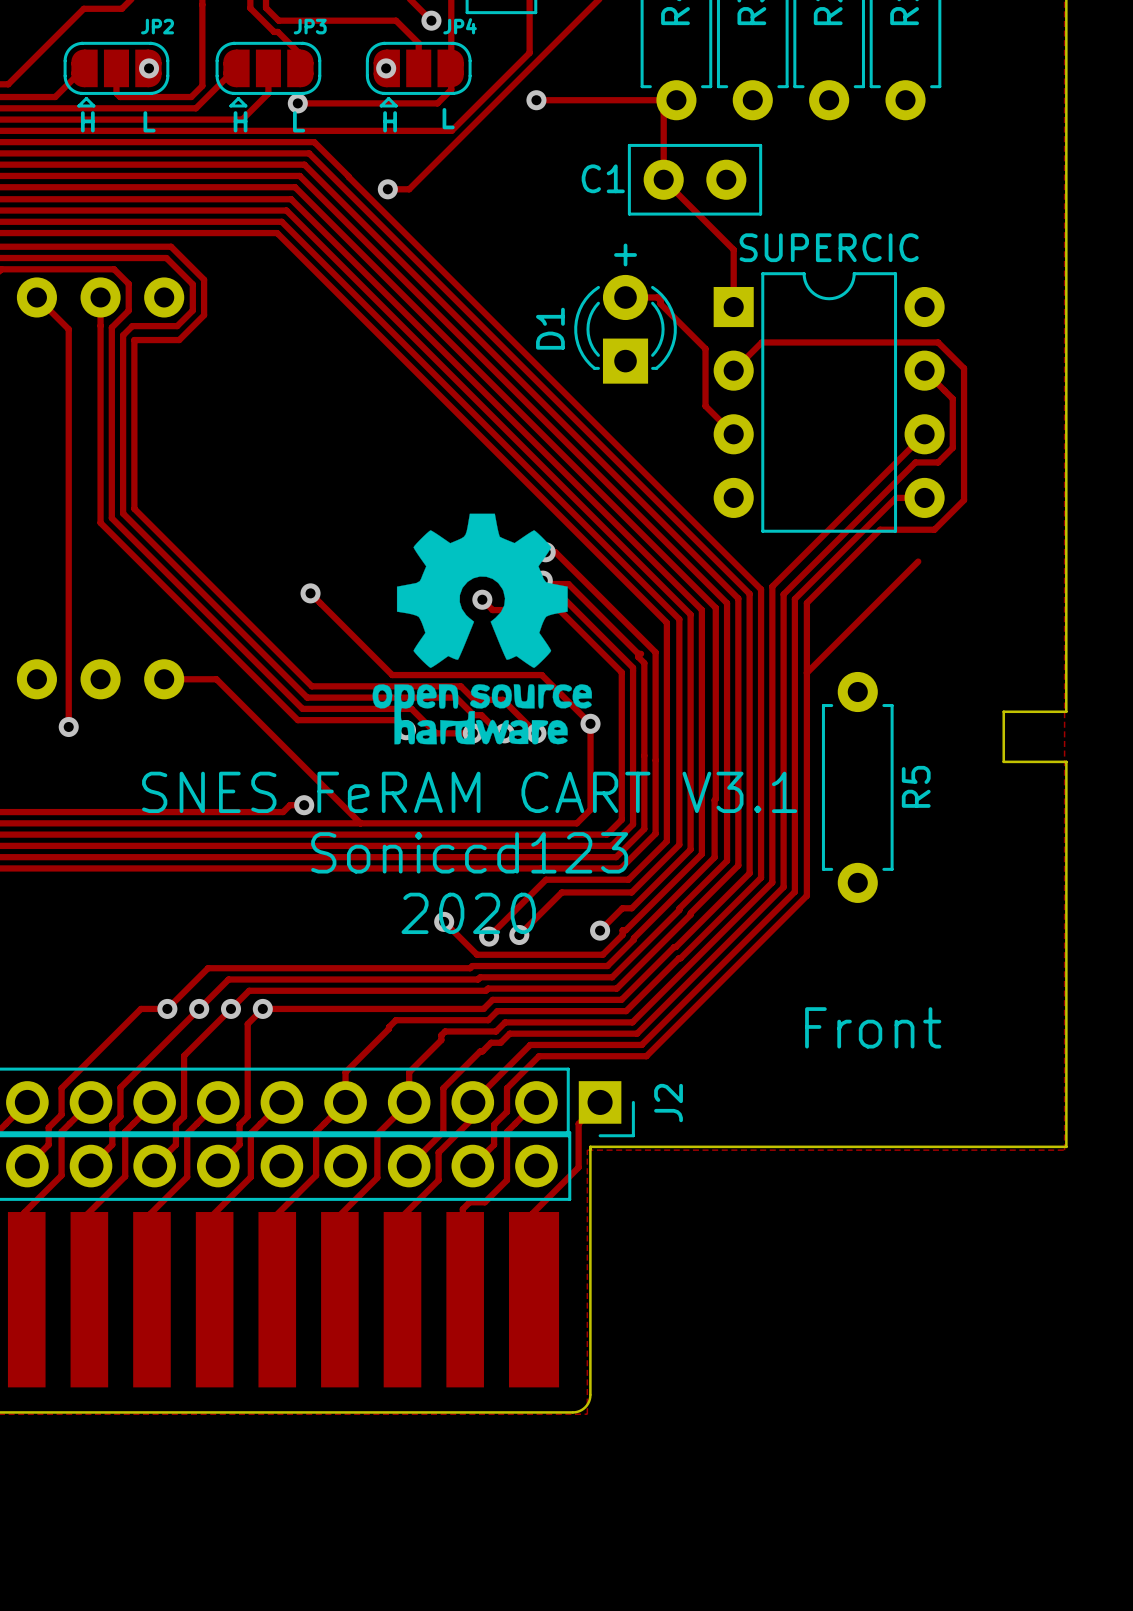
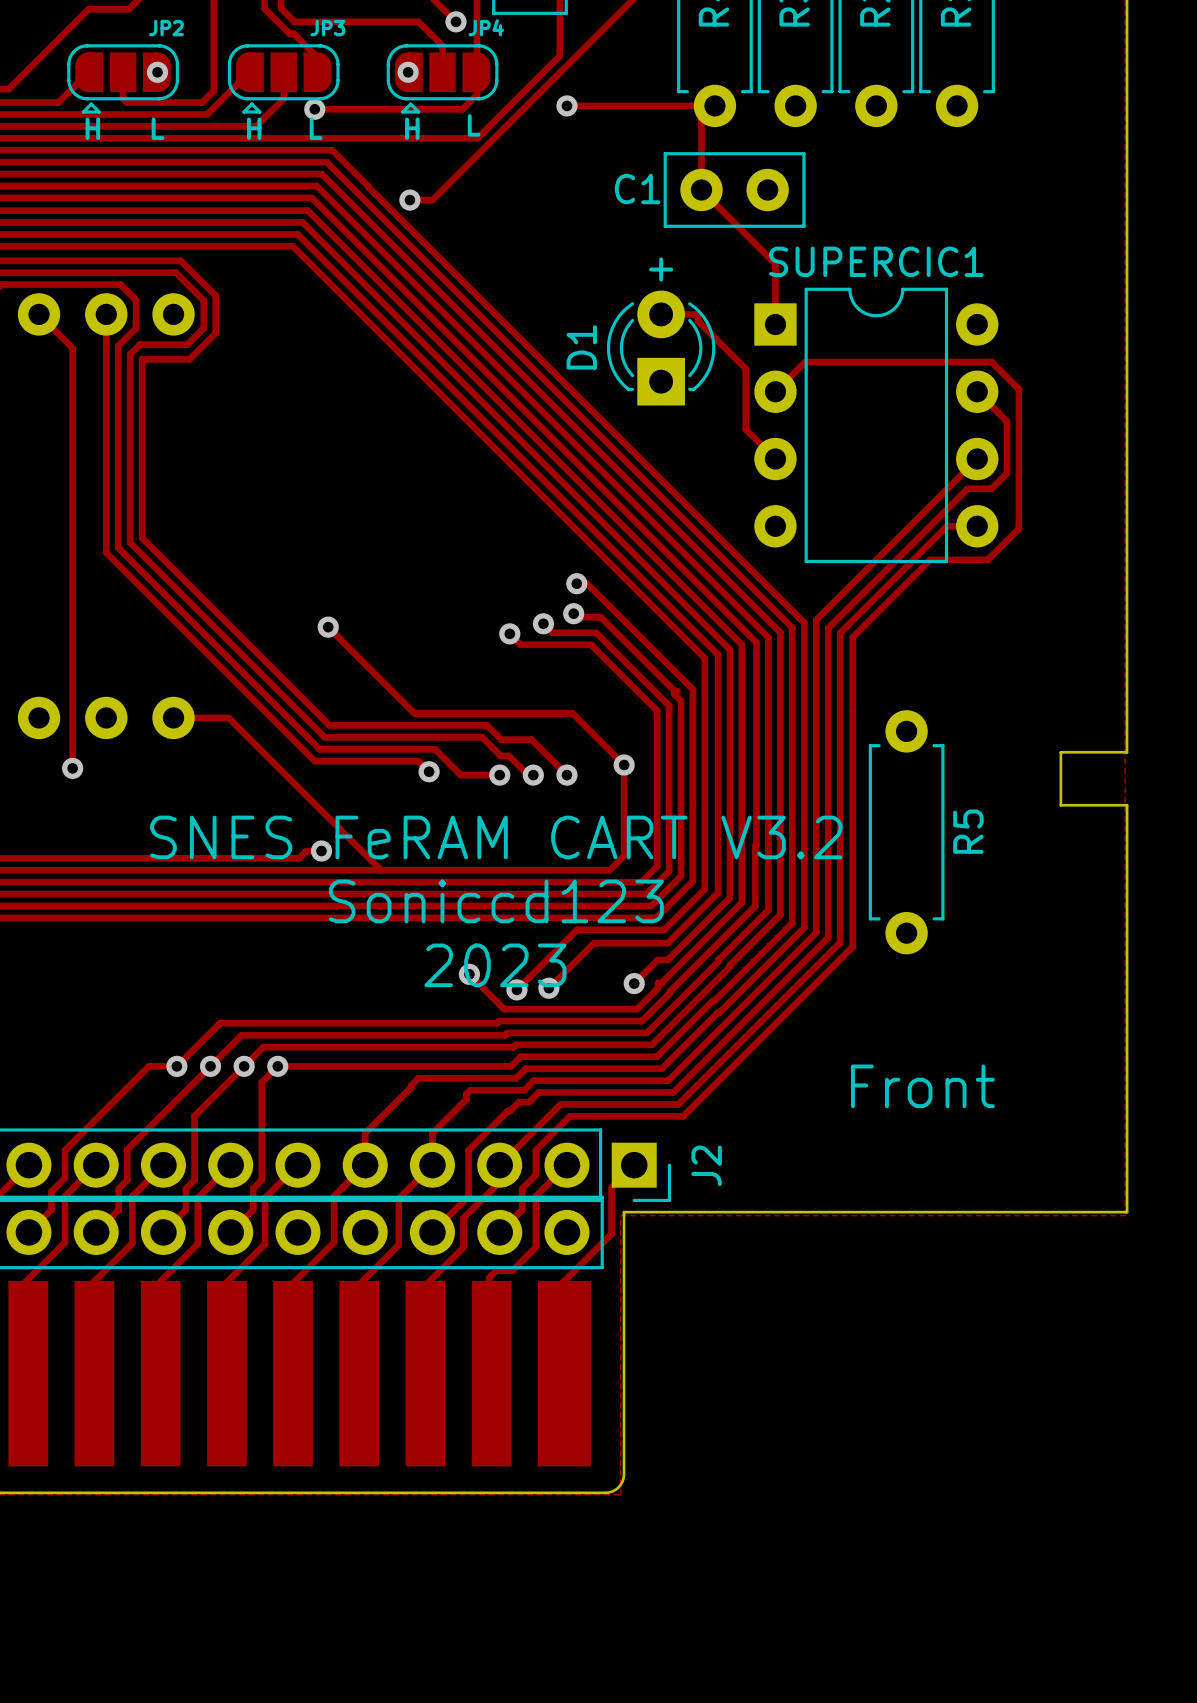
SUPERCIC name: SUPERCIC (829, 247) -> SUPERCIC1 (876, 261)
drawing: [372, 513, 592, 745] -> none
track: (918, 561) (806, 672) -> none
text: SNES FeRAM CART V3.1 (469, 792) -> SNES FeRAM CART V3.2 (496, 837)
text: 2020 (468, 913) -> 2023 (495, 965)

